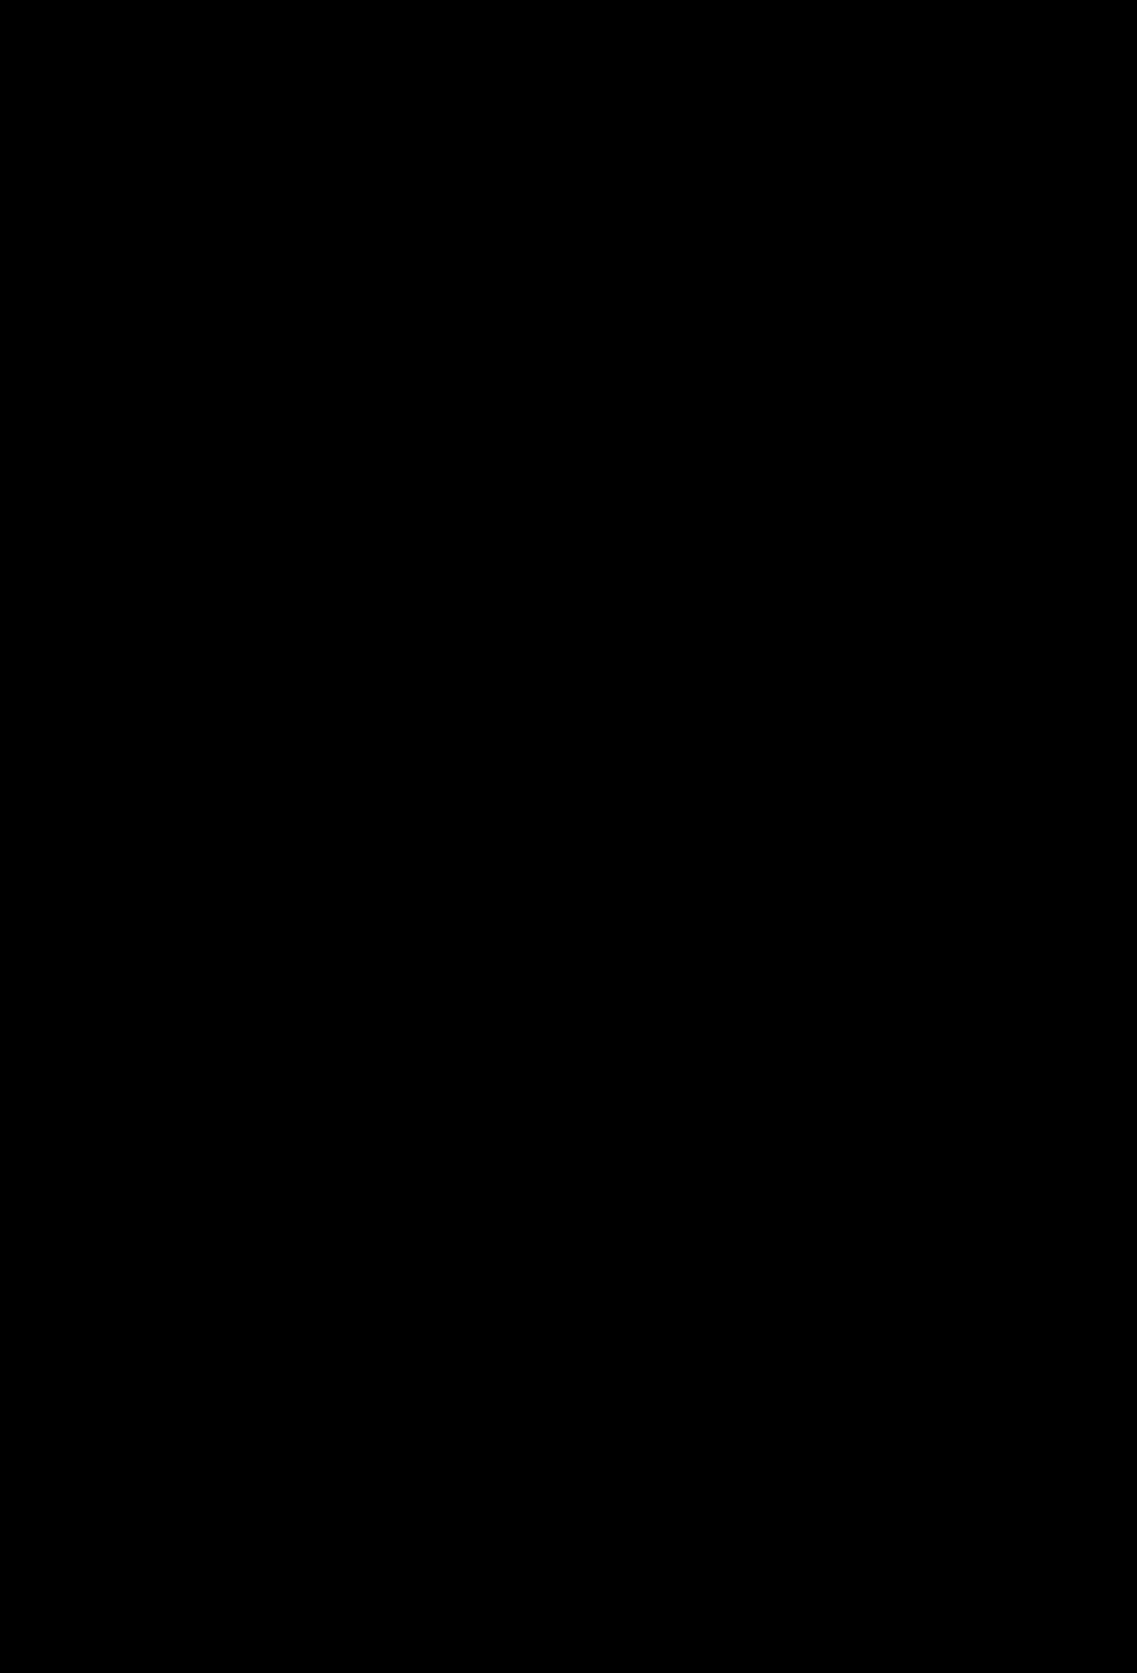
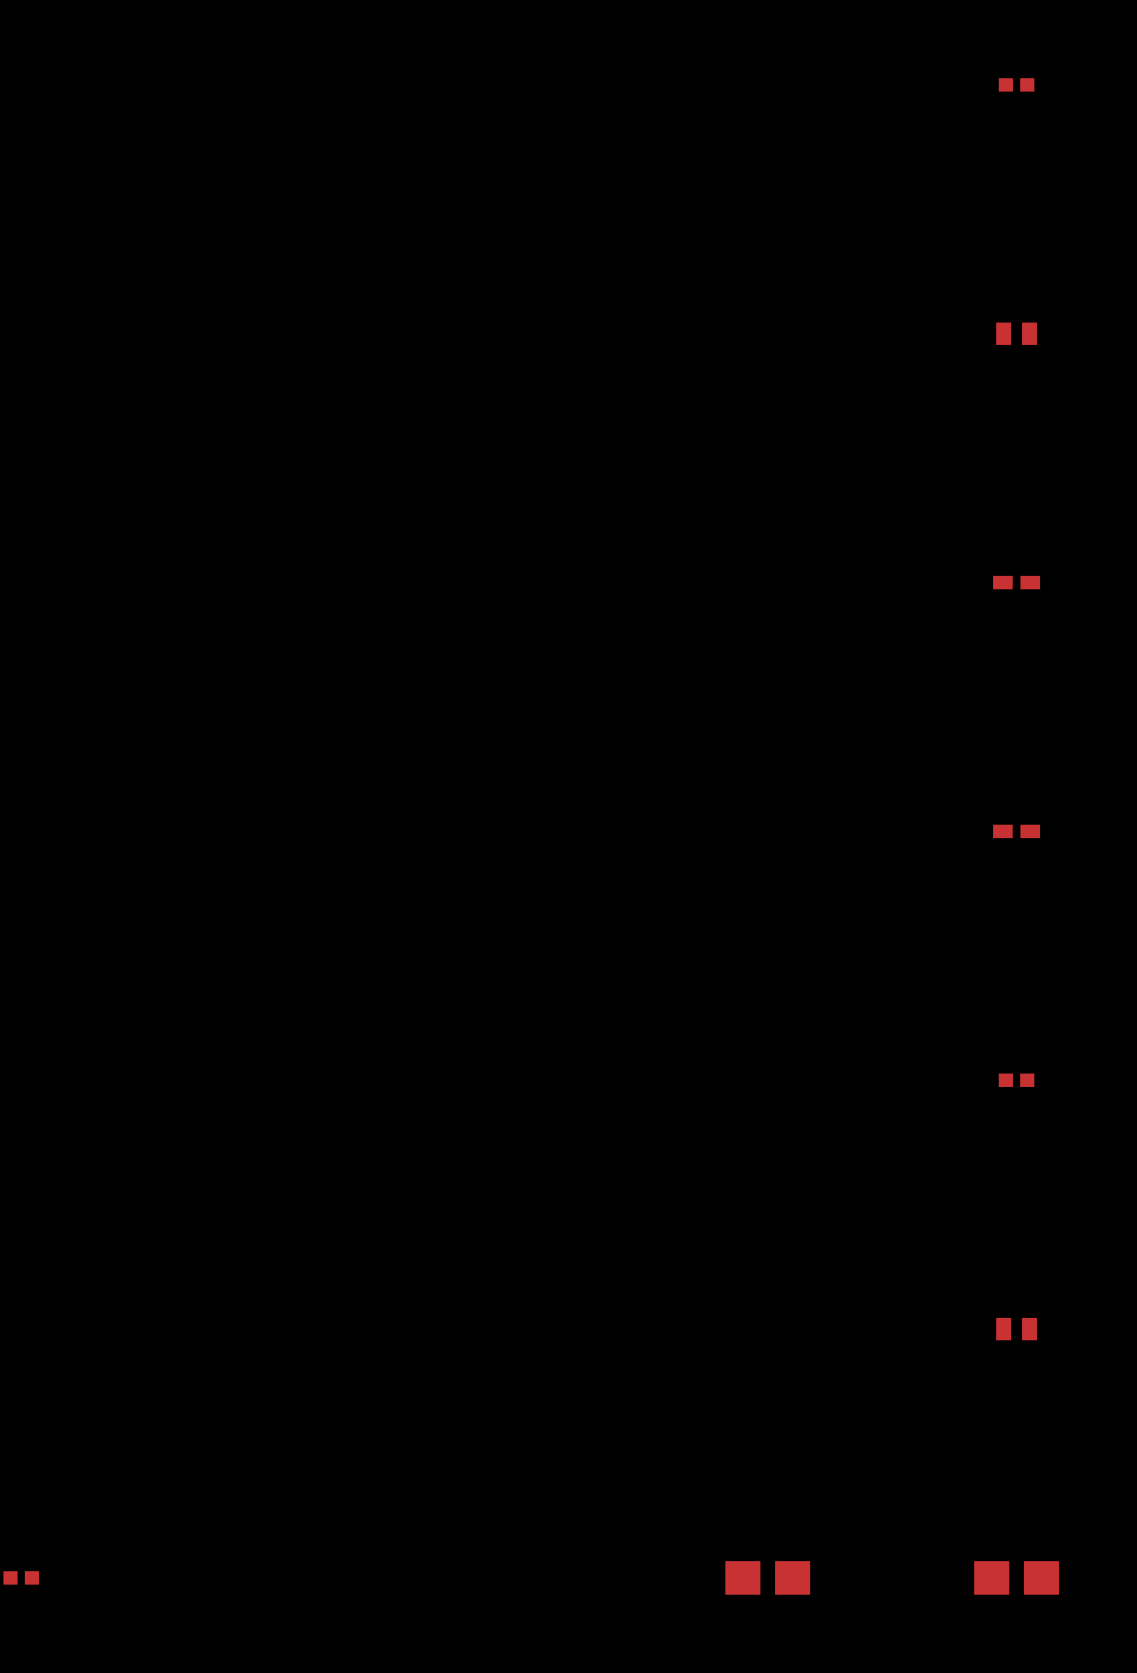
part: none -> (1016, 84)
part: none -> (1016, 333)
part: none -> (1016, 582)
part: none -> (1016, 831)
part: none -> (1016, 1080)
part: none -> (1016, 1329)
part: none -> (21, 1577)
part: none -> (767, 1577)
part: none -> (1016, 1577)

